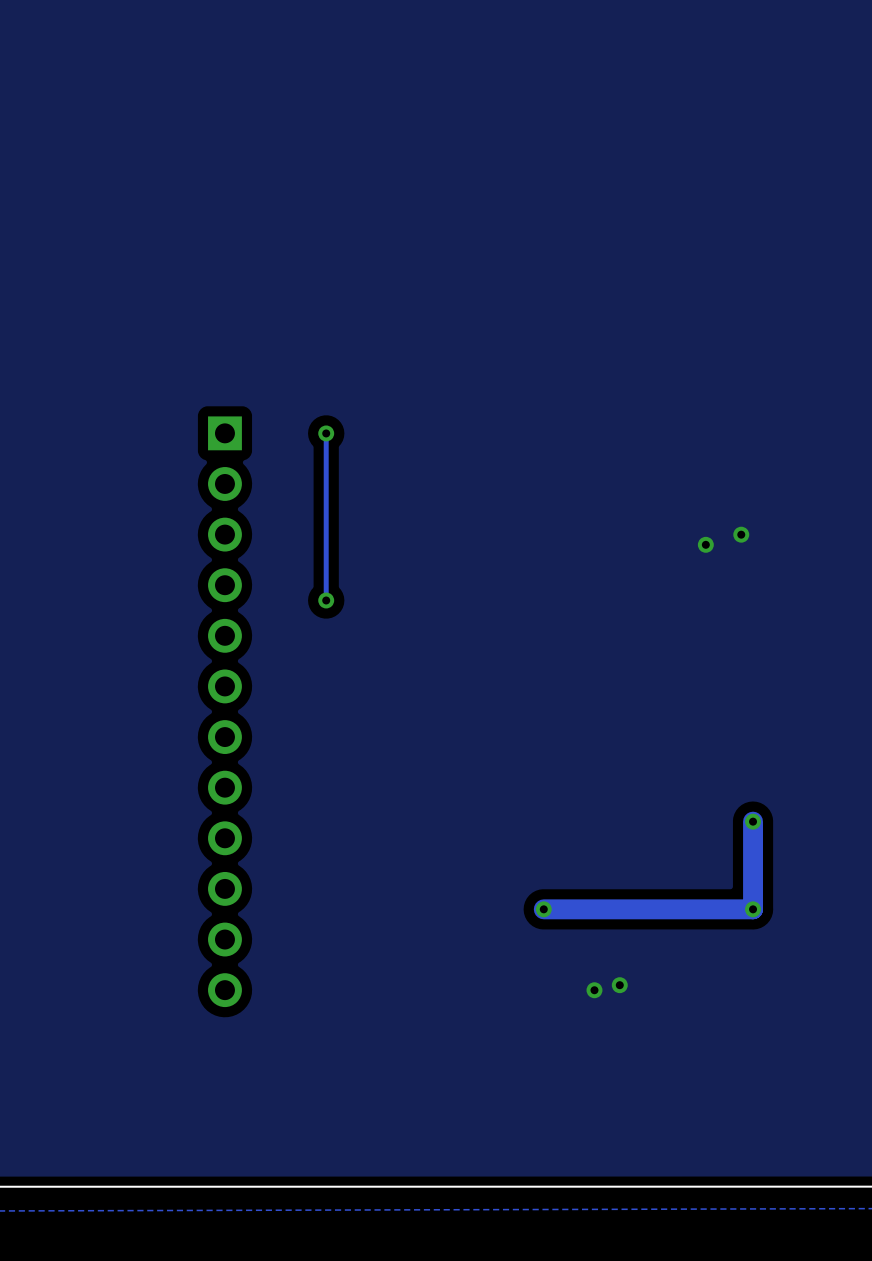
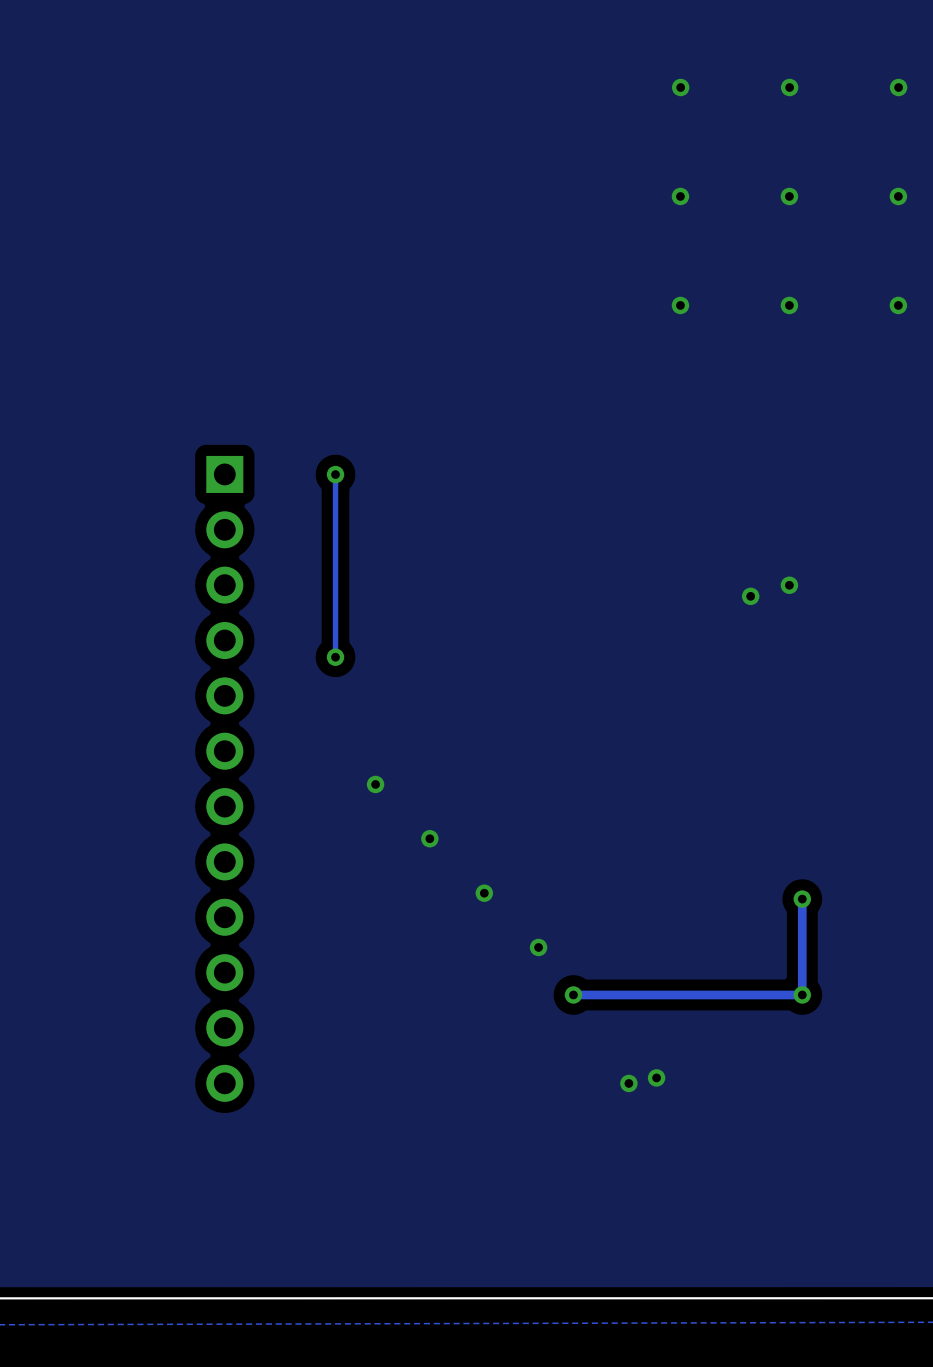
via: none -> (680, 87)
via: none -> (789, 87)
via: none -> (898, 87)
via: none -> (680, 196)
via: none -> (789, 196)
via: none -> (898, 196)
via: none -> (680, 305)
via: none -> (789, 305)
via: none -> (898, 305)
via: none -> (375, 784)
via: none -> (429, 838)
via: none -> (484, 893)
track width: thick (753, 821) (753, 909) (543, 909) -> thin (802, 899) (802, 994) (573, 994)
via: none -> (538, 947)

